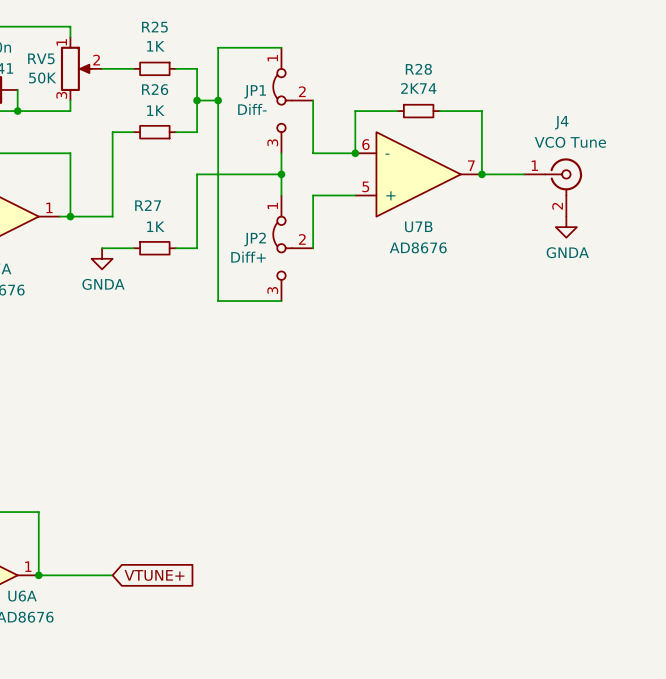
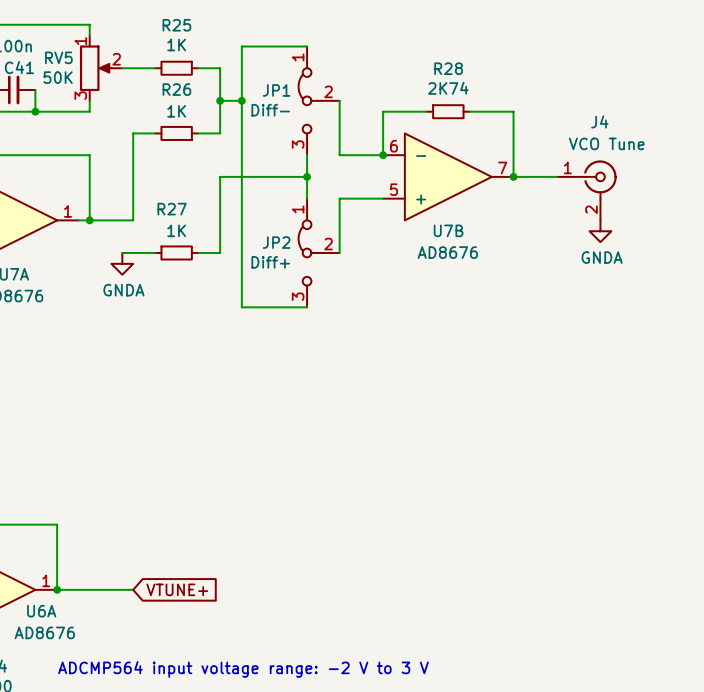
text: none -> ADCMP564 input voltage range: -2 V to 3 V (243, 669)

